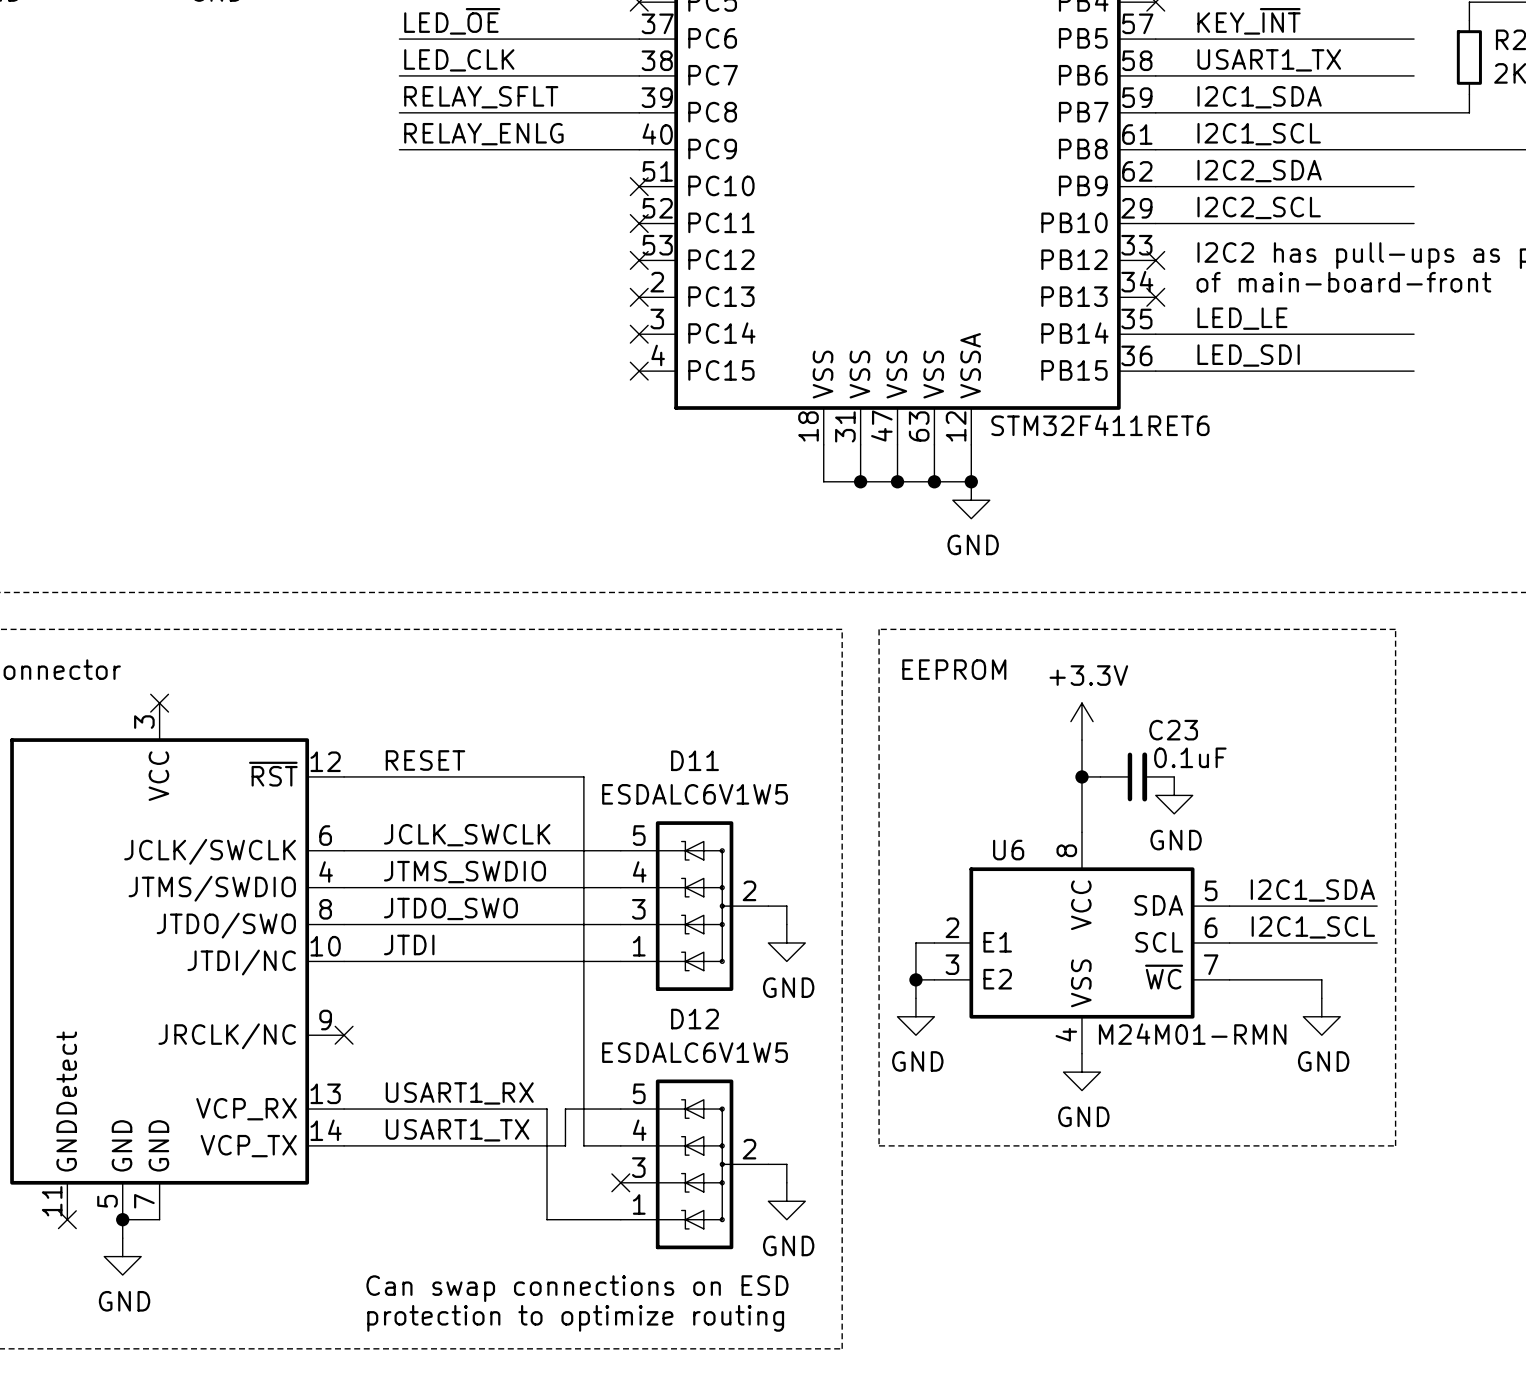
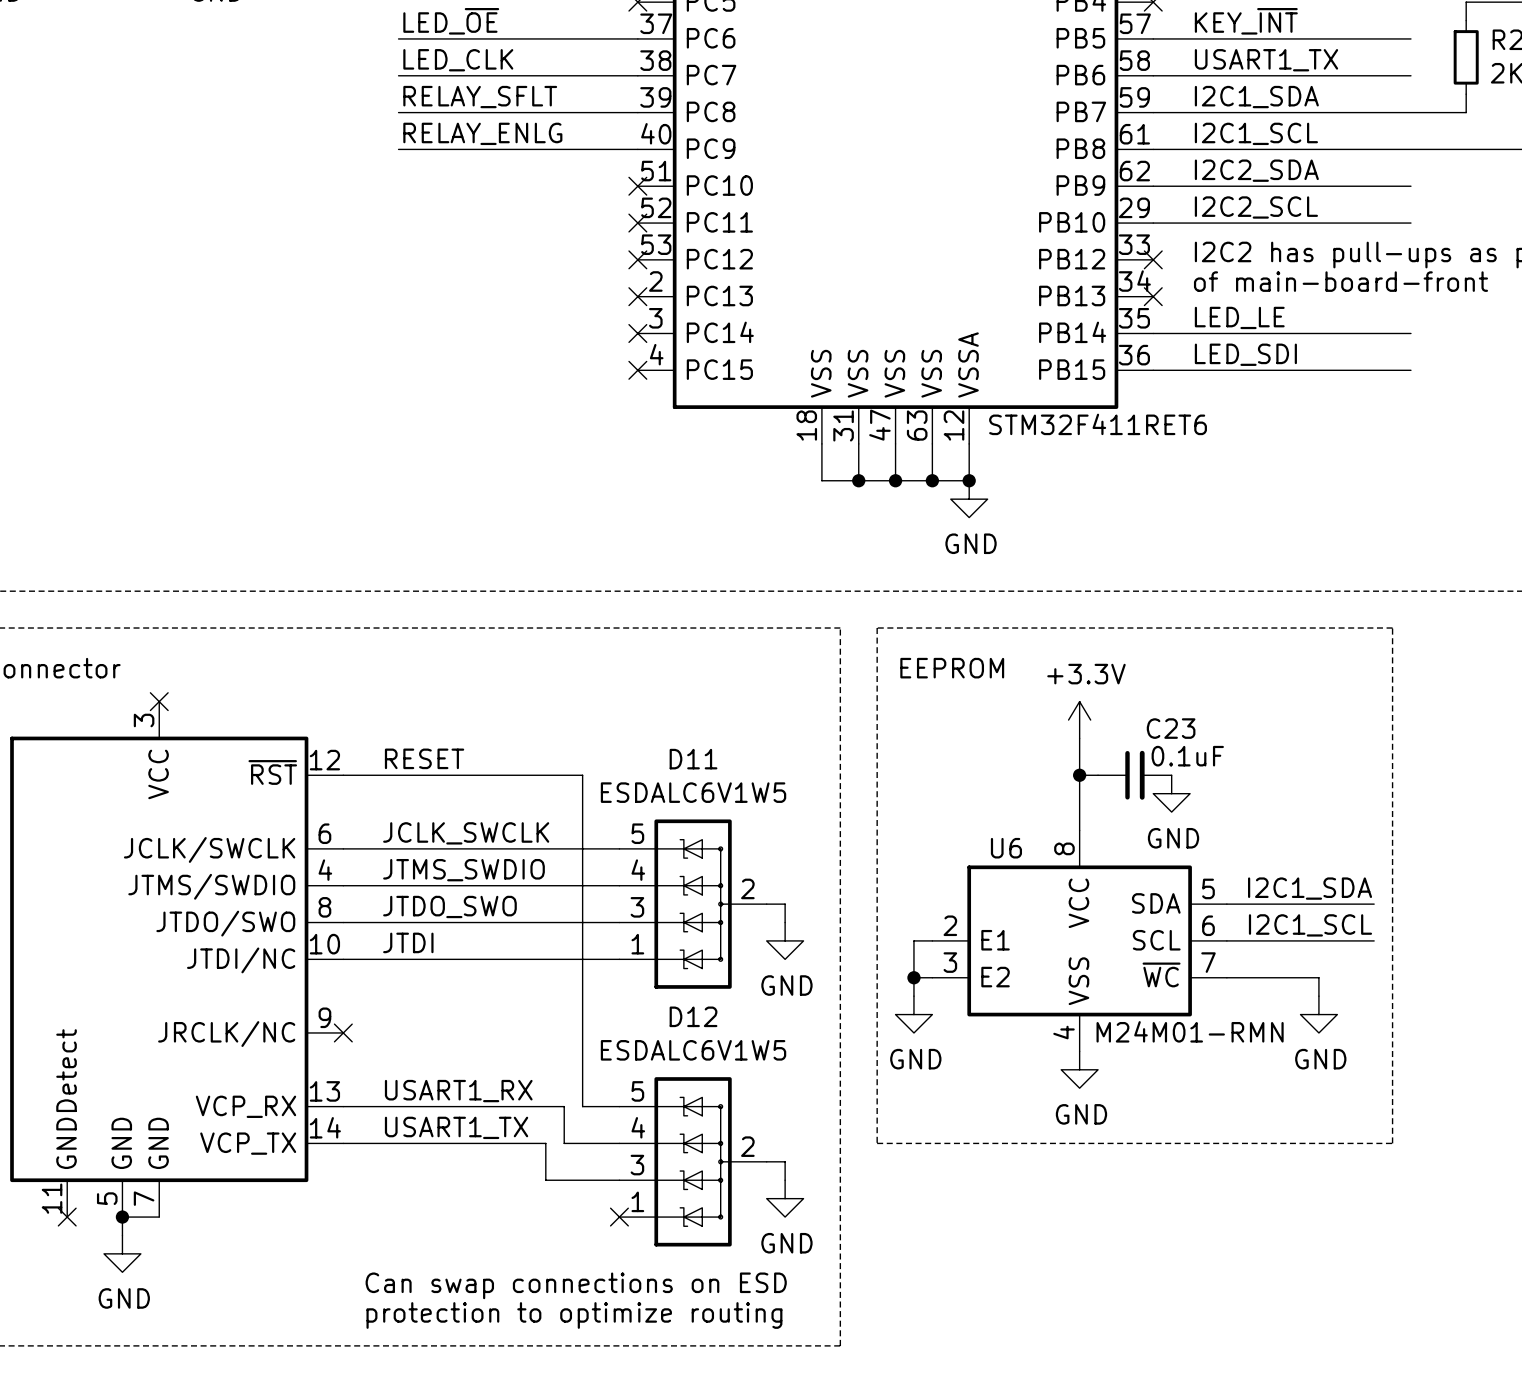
wire: (547, 1109) (547, 1145) (565, 1145) -> (545, 1106) (564, 1106)
wire: (565, 1109) (583, 1109) (583, 1145) -> (564, 1143) (582, 1143)
wire: (547, 1182) (547, 1219) (620, 1219) -> (545, 1180) (619, 1180)
no-connect mark position: (620, 1182) -> (619, 1217)

